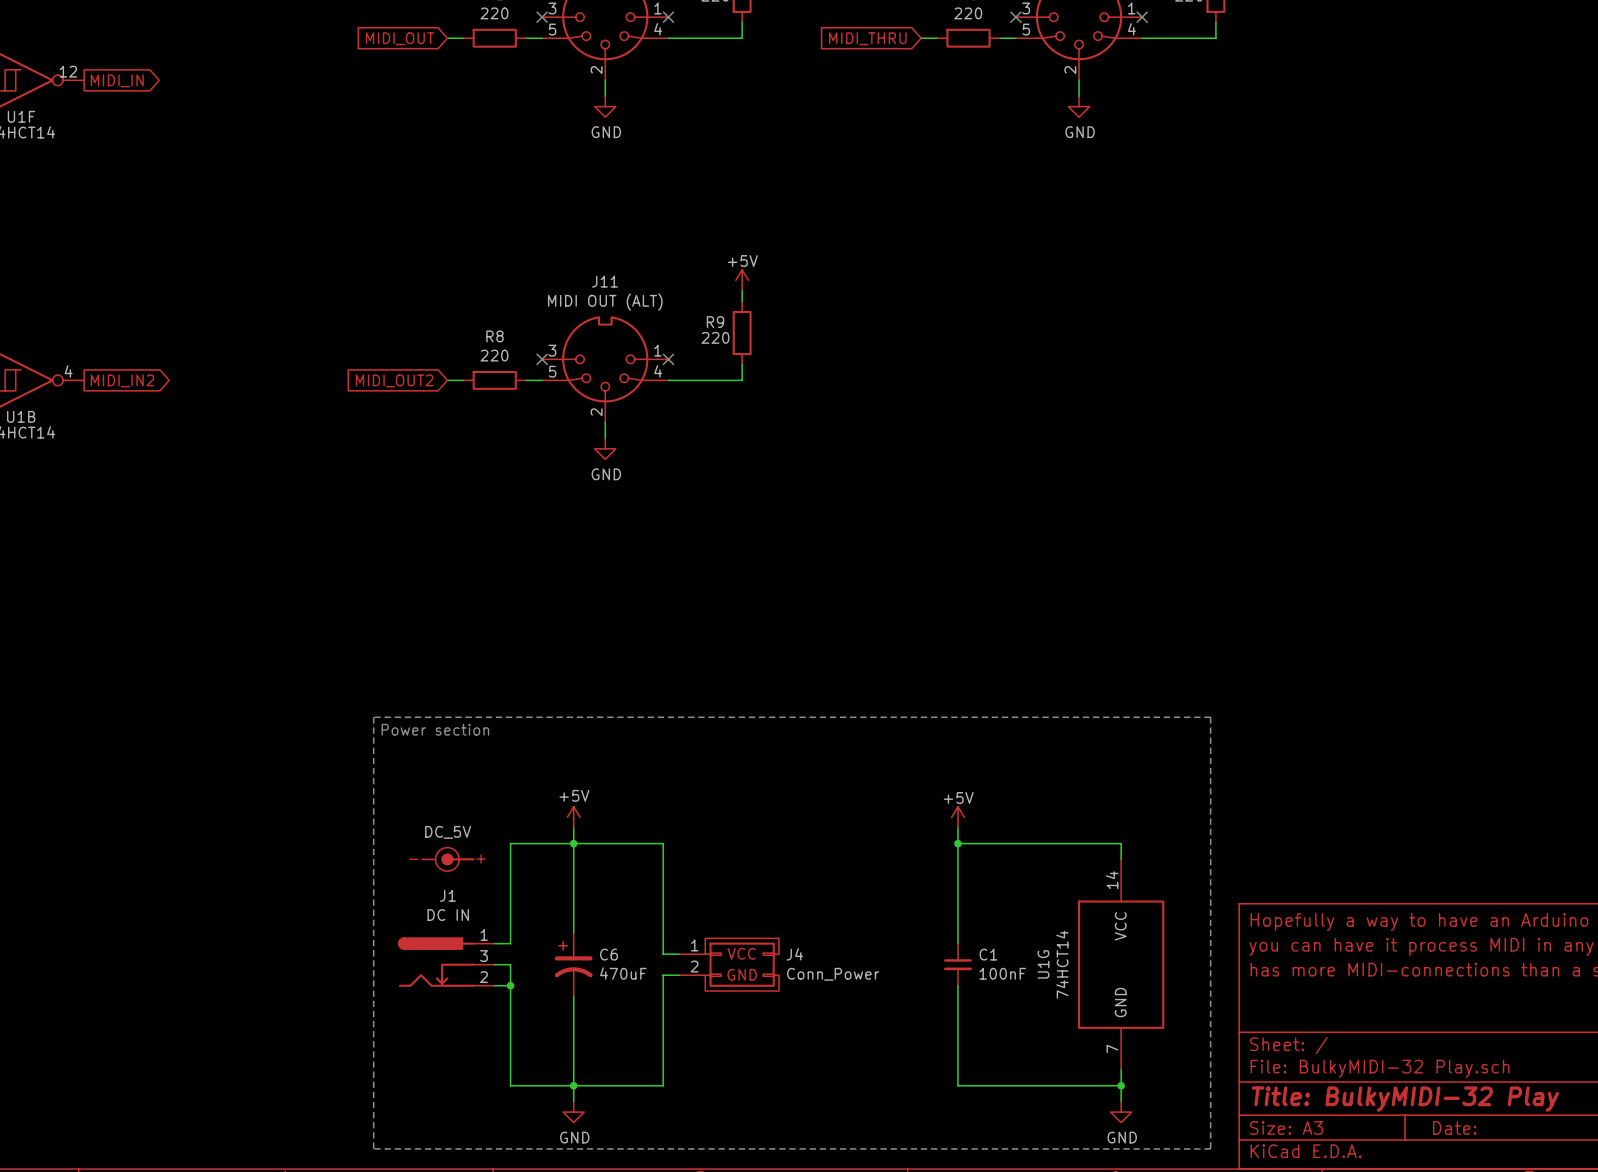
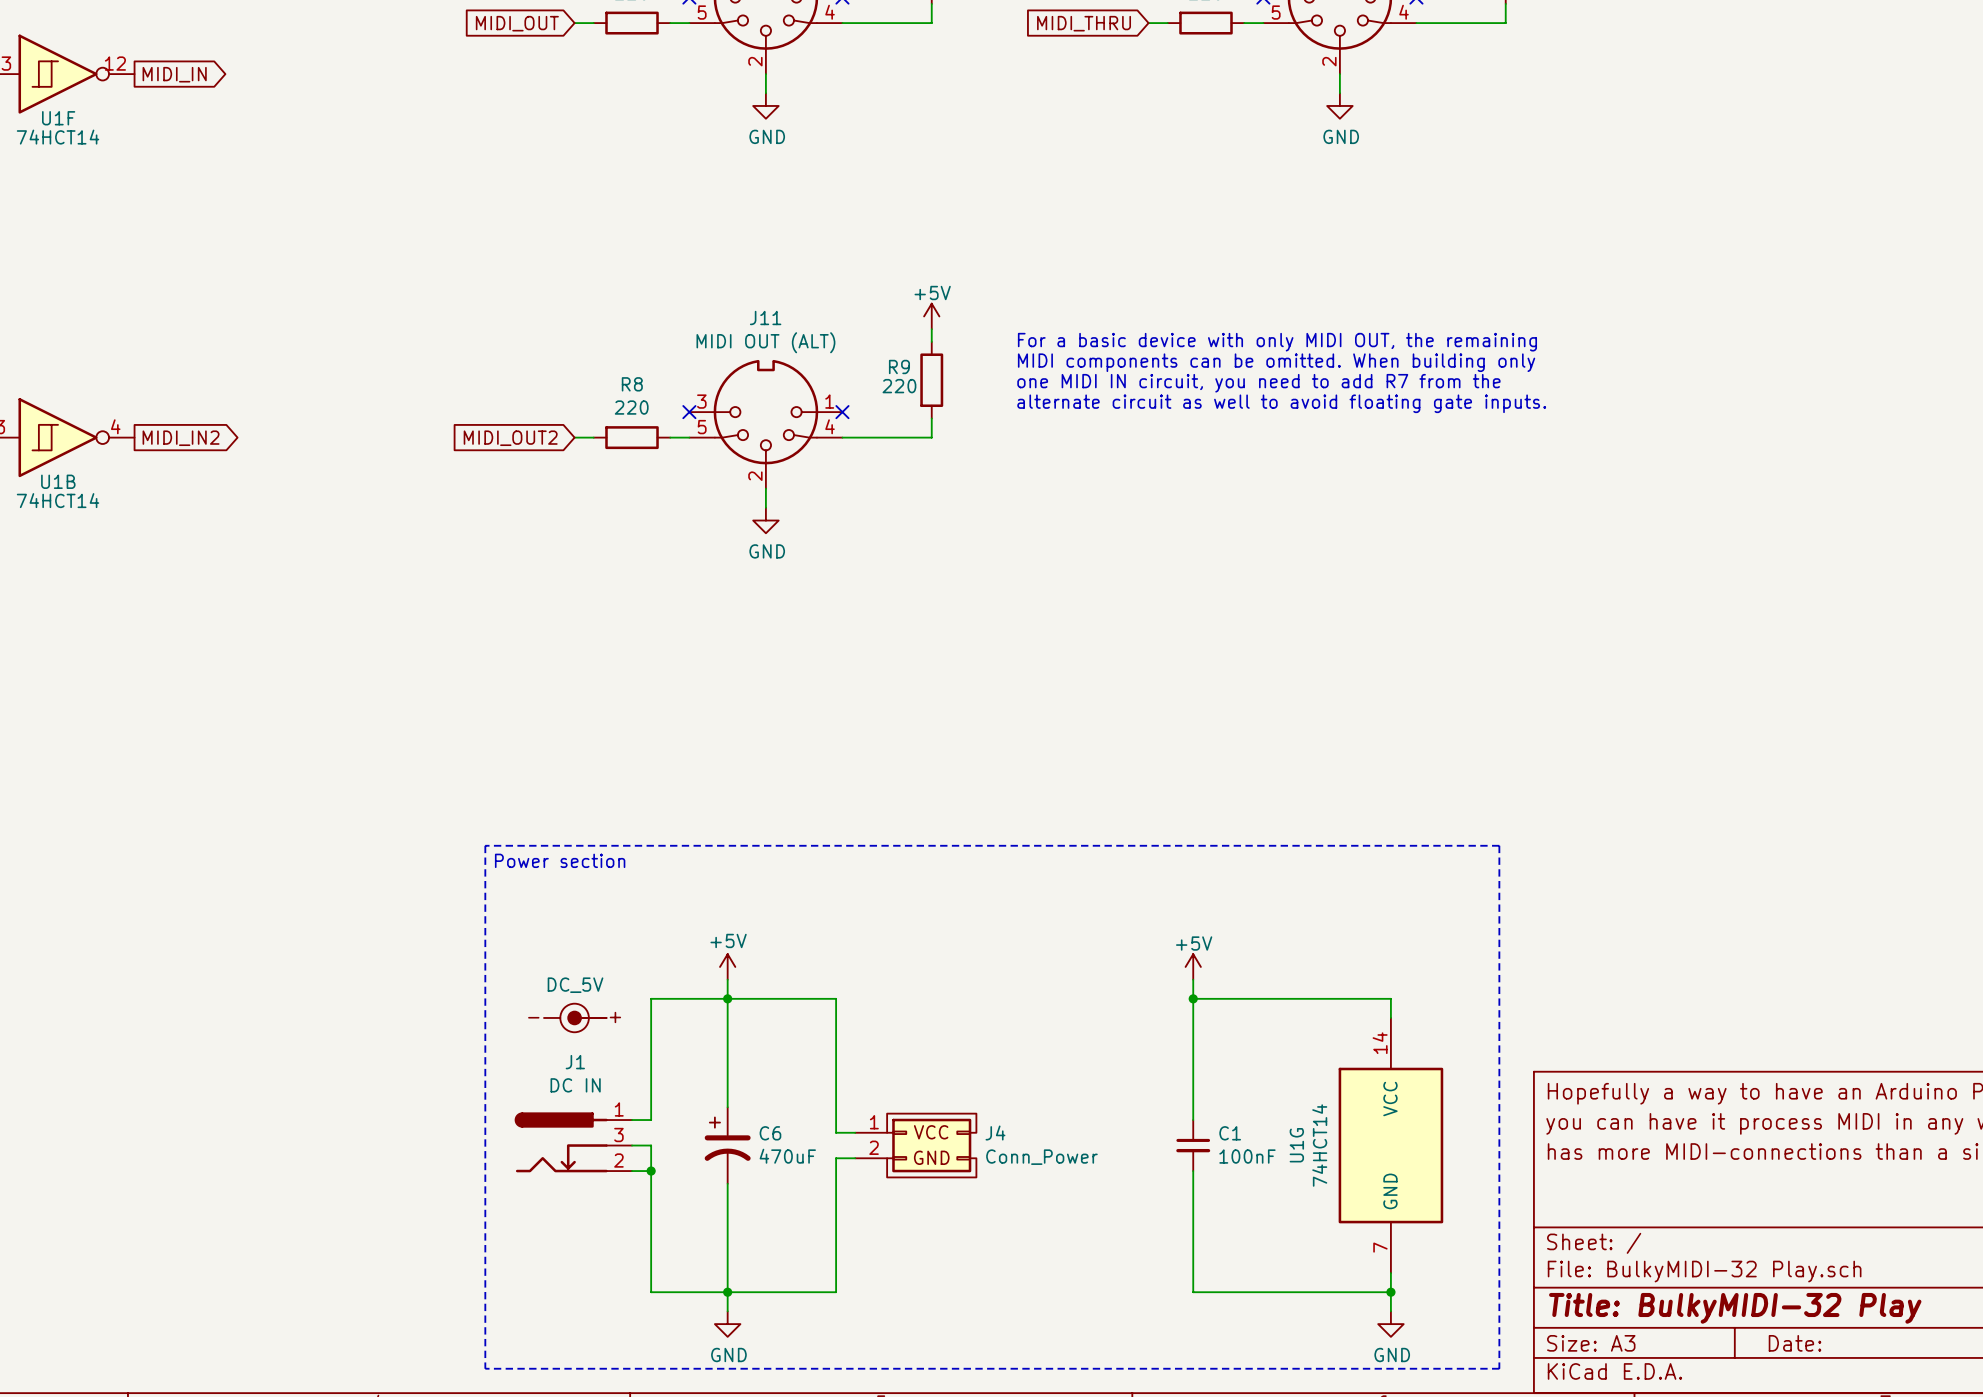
text: none -> For a basic device with only MIDI OUT, the remaining (1277, 342)
text: none -> MIDI components can be omitted. When building only (1276, 362)
text: none -> one MIDI IN circuit, you need to add R7 from the (1258, 383)
text: none -> alternate circuit as well to avoid floating gate inputs. (1281, 403)

